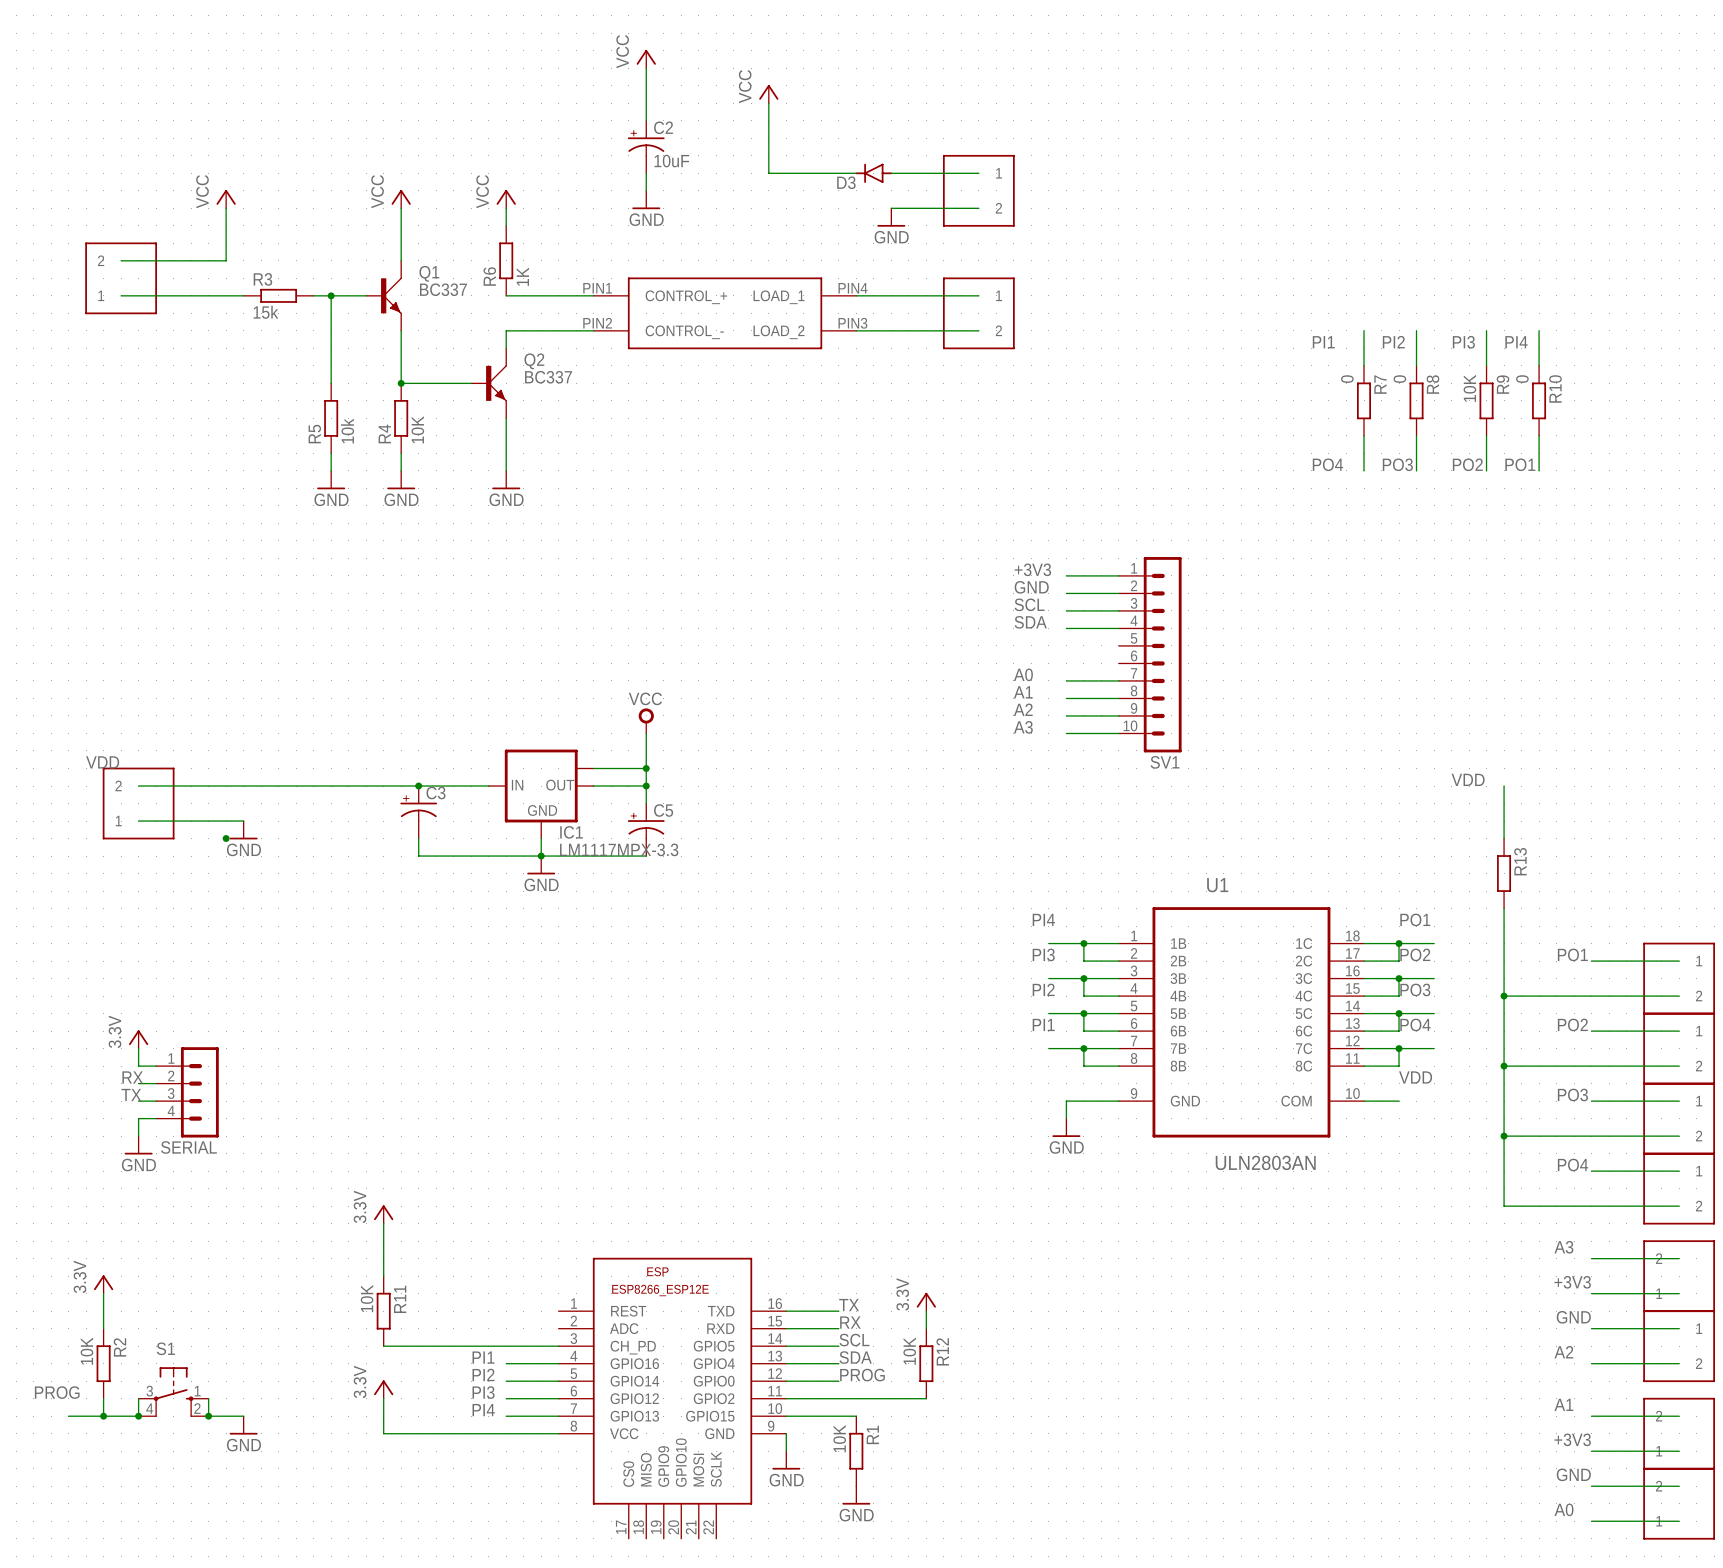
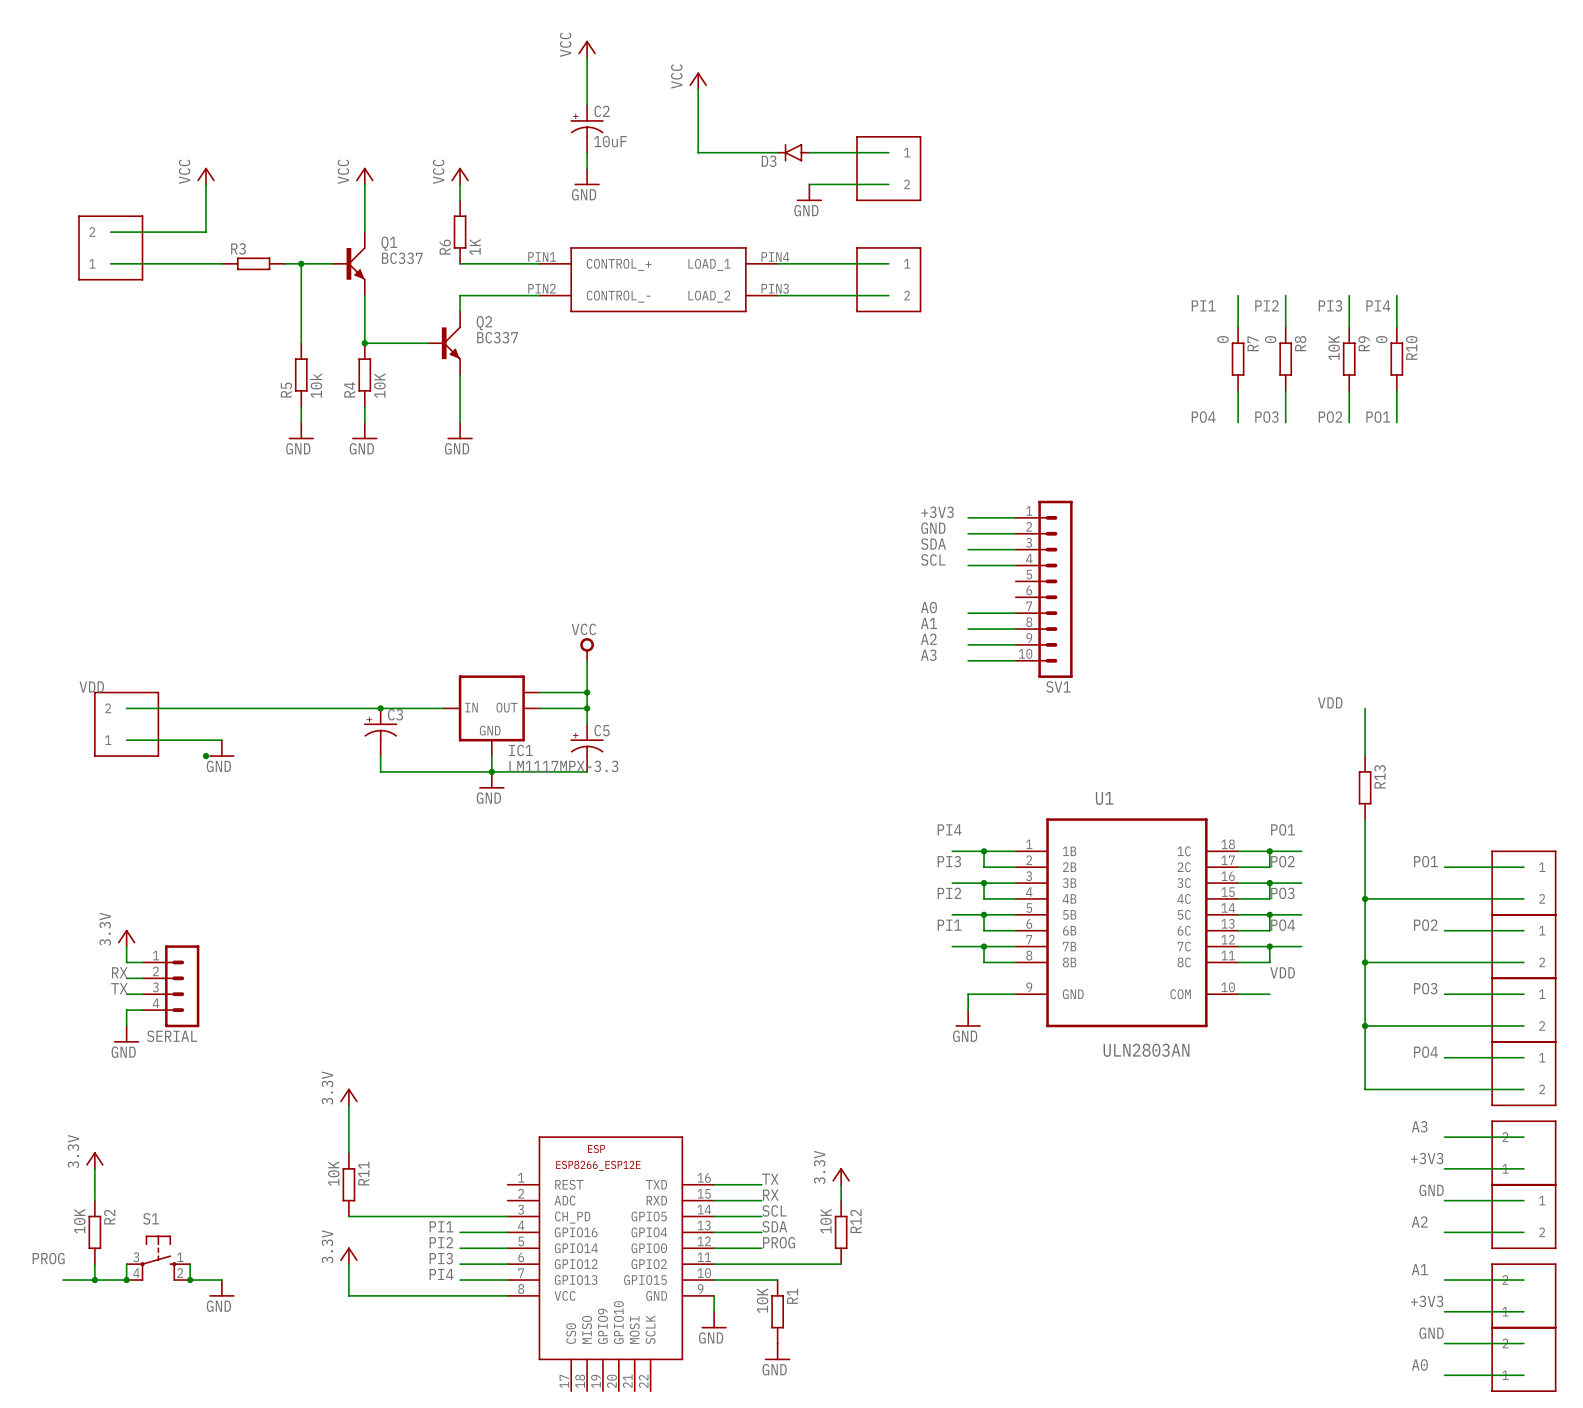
R3 value: 15k (265, 312) -> none
label: SCL (1029, 604) -> SDA (933, 544)
label: SDA (1030, 622) -> SCL (933, 559)

